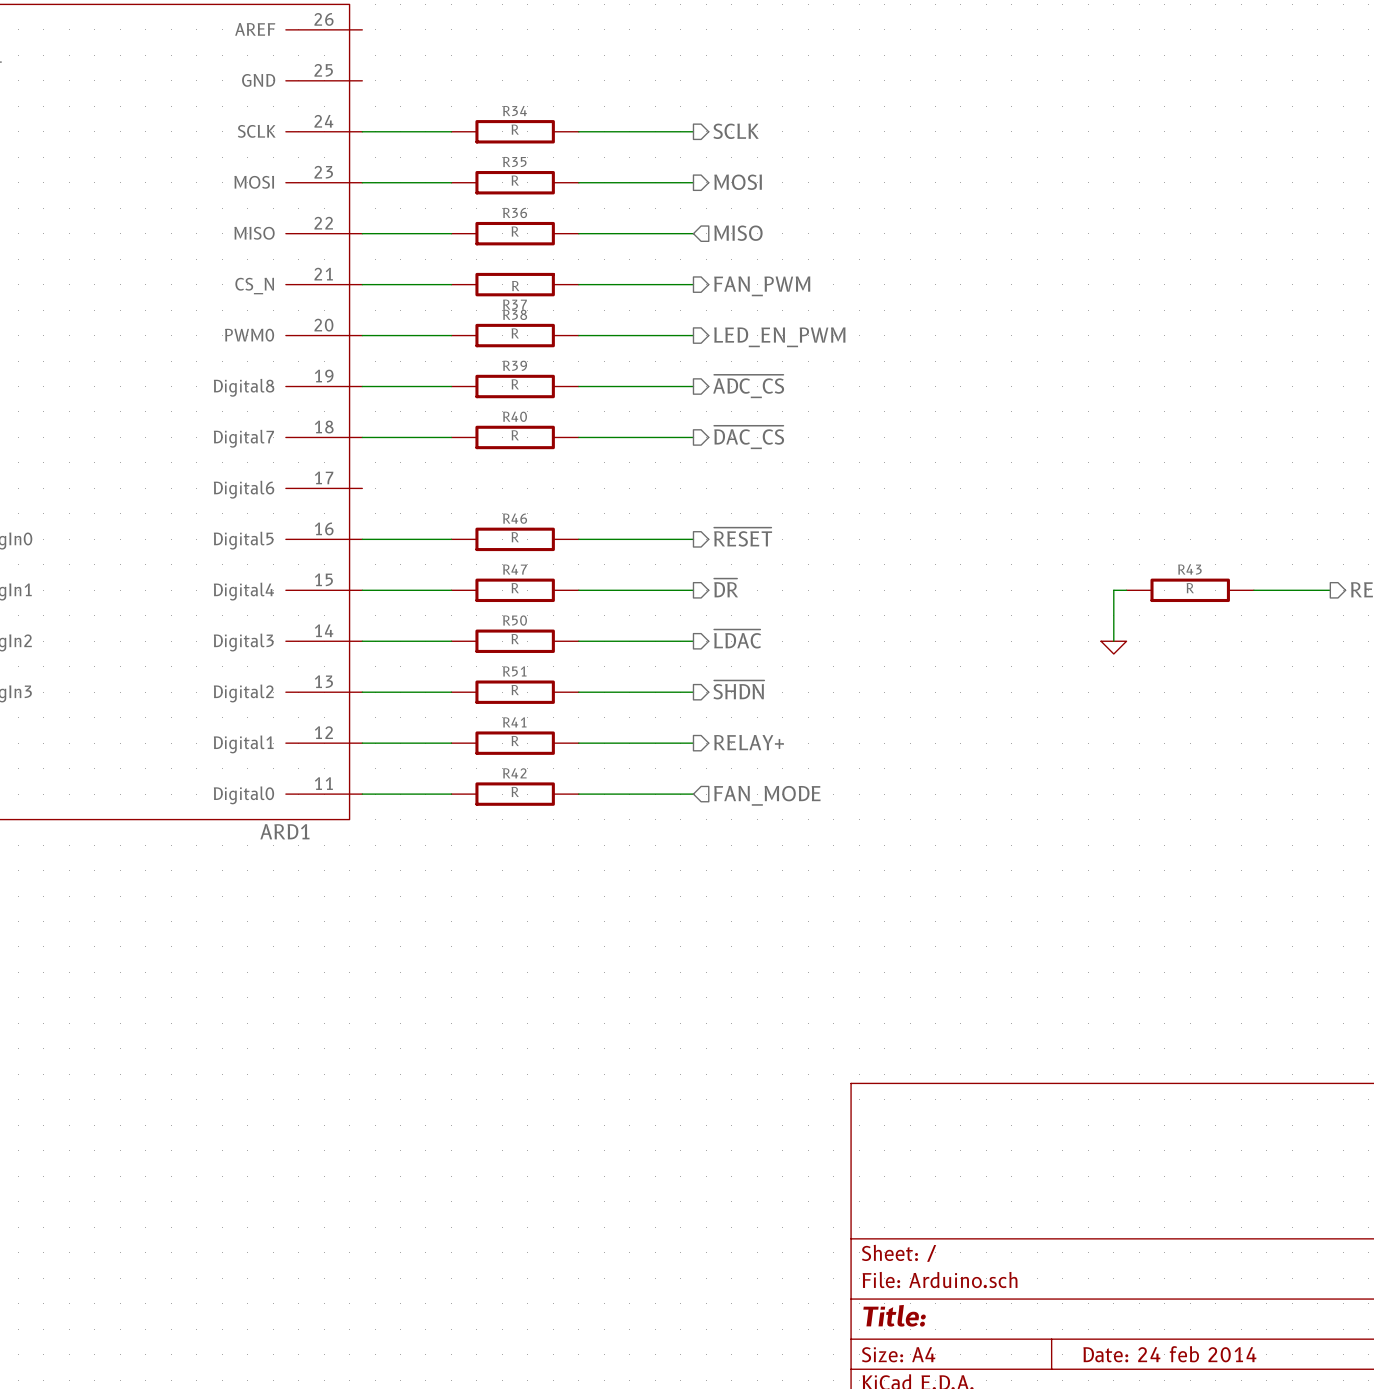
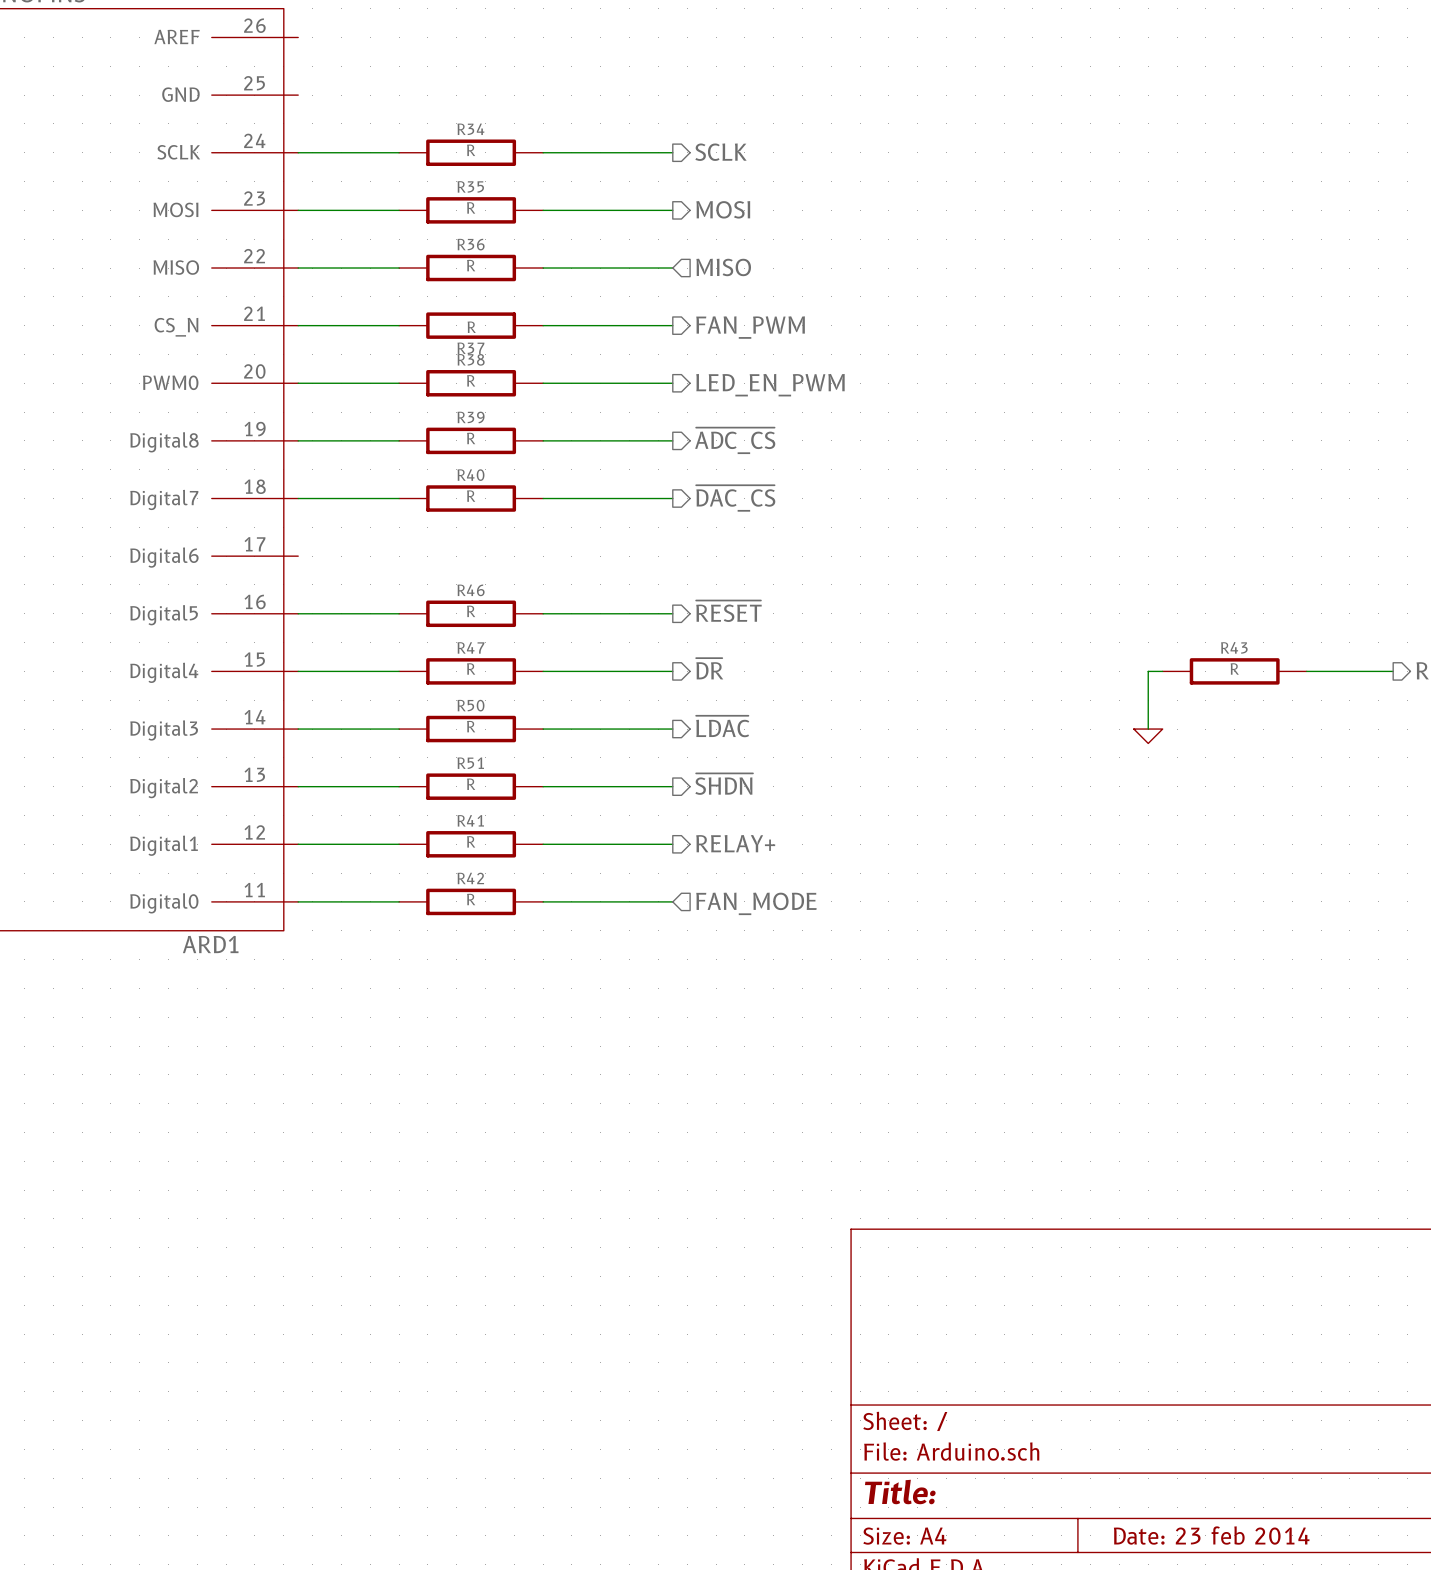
title block: Date: 24 feb 2014 (1169, 1354) -> Date: 23 feb 2014 (1211, 1535)

